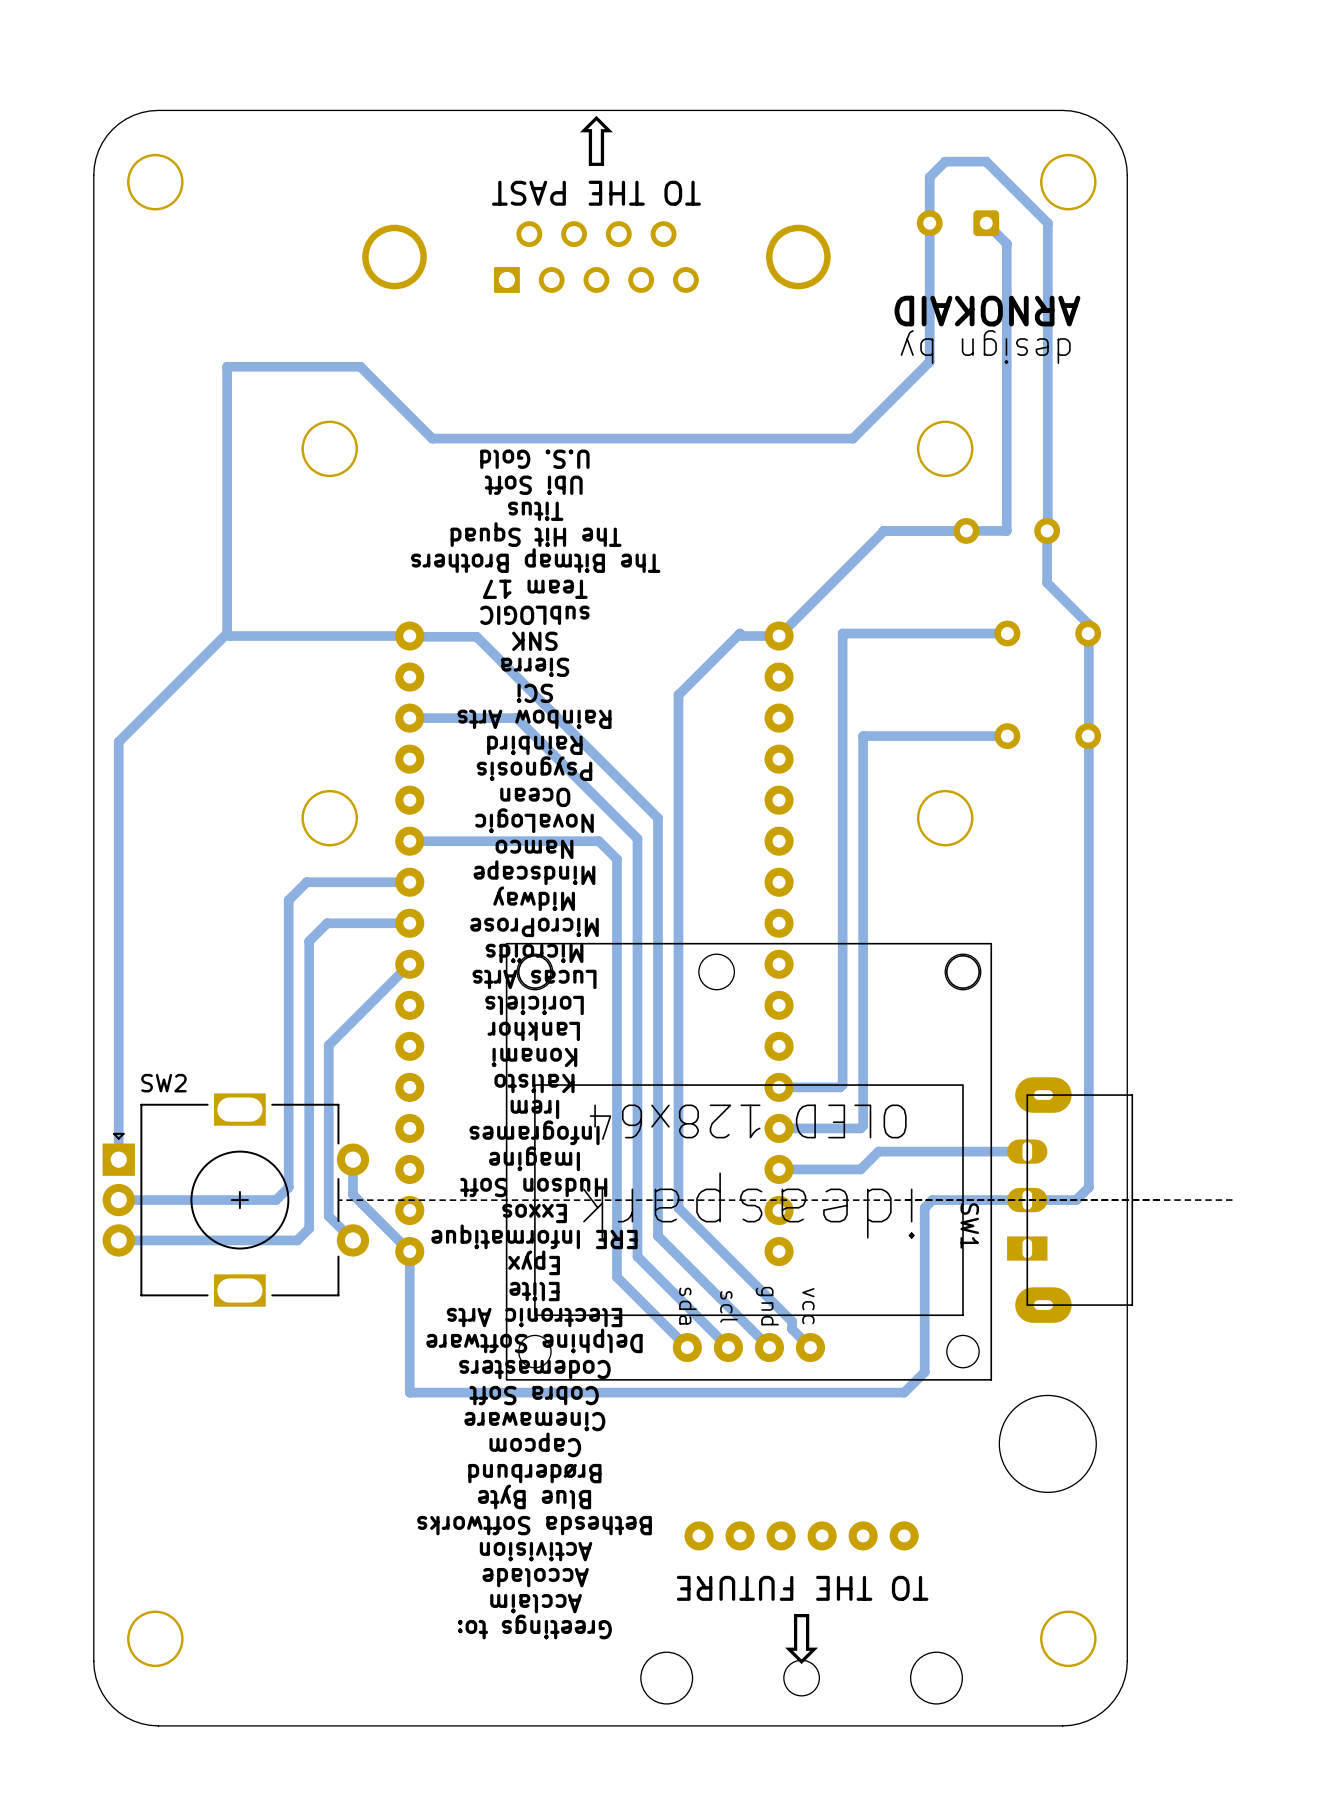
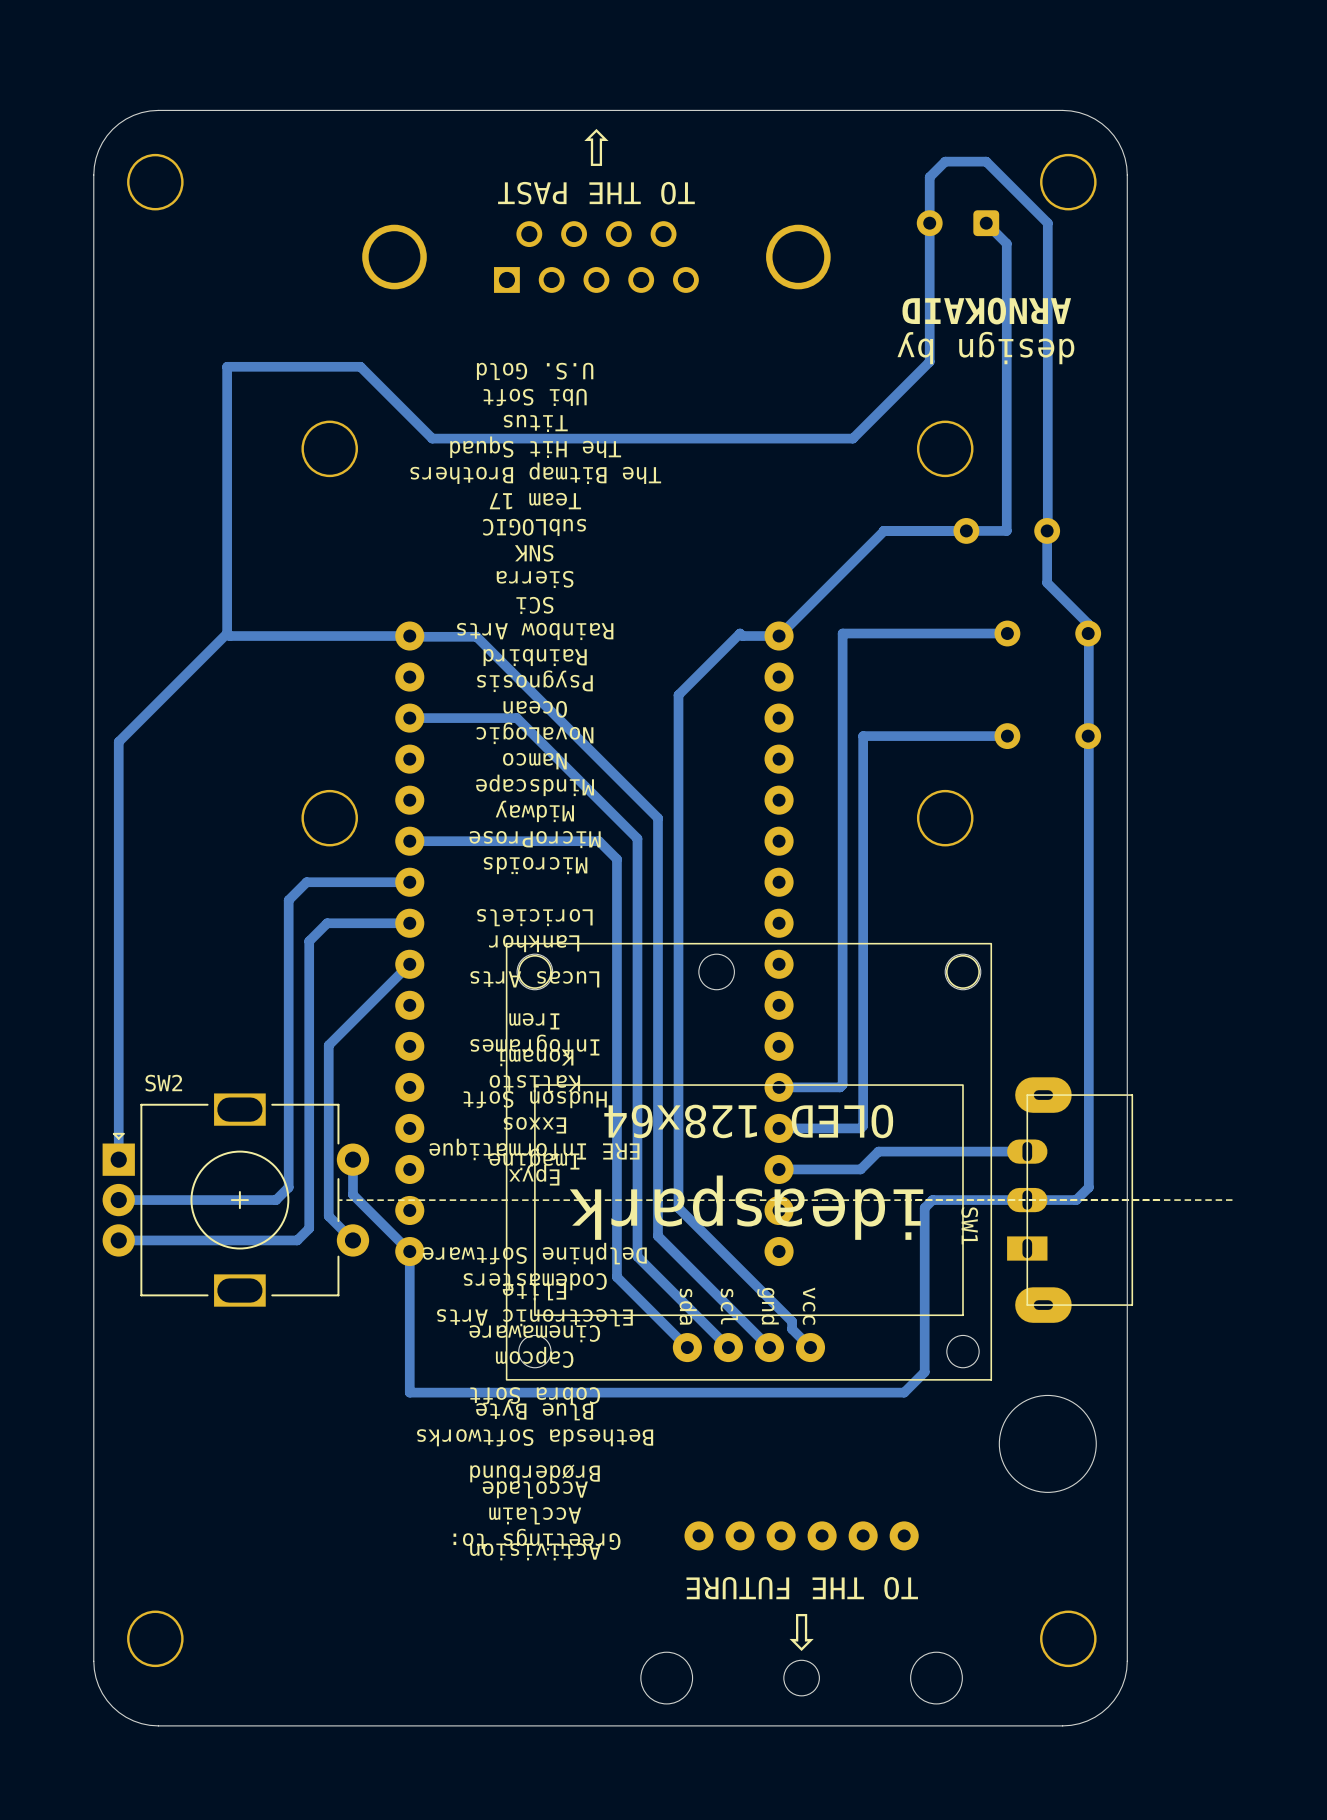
text position: U.S. Gold (534, 459) -> U.S. Gold (535, 371)
text position: Ubi Soft (533, 485) -> Ubi Soft (535, 397)
text position: Titus (535, 511) -> Titus (535, 423)
text position: The Hit Squad (536, 534) -> The Hit Squad (535, 447)
text position: The Bitmap Brothers (535, 560) -> The Bitmap Brothers (535, 473)
text position: Team 17 (535, 589) -> Team 17 (535, 501)
text position: subLOGIC (534, 615) -> subLOGIC (534, 527)
text position: SNK (534, 641) -> SNK (534, 553)
text position: Sierra (535, 667) -> Sierra (535, 579)
text position: SCi (534, 693) -> SCi (534, 605)
text position: Rainbow Arts (534, 719) -> Rainbow Arts (535, 631)
text position: Rainbird (534, 745) -> Rainbird (535, 657)
text position: Psygnosis (534, 768) -> Psygnosis (534, 681)
text position: Ocean (535, 797) -> Ocean (535, 709)
text position: NovaLogic (534, 820) -> NovaLogic (535, 733)
text position: Namco (534, 849) -> Namco (534, 761)
text position: Mindscape (534, 872) -> Mindscape (535, 785)
text position: Midway (534, 898) -> Midway (534, 811)
text position: MicroProse (534, 927) -> MicroProse (535, 839)
text position: Microïds (534, 953) -> Microïds (535, 865)
text position: Loriciels (534, 1005) -> Loriciels (534, 917)
text position: Lankhor (533, 1031) -> Lankhor (534, 943)
text position: Irem (534, 1109) -> Irem (534, 1021)
text position: Infogrames (534, 1132) -> Infogrames (534, 1045)
text position: Hudson Soft (533, 1187) -> Hudson Soft (535, 1099)
text position: Exxos (534, 1213) -> Exxos (534, 1125)
text position: ERE Informatique (534, 1236) -> ERE Informatique (534, 1149)
text position: Epyx (534, 1262) -> Epyx (534, 1175)
text position: Delphine Software (534, 1340) -> Delphine Software (534, 1253)
text position: Codemasters (534, 1369) -> Codemasters (535, 1281)
text position: Cinemaware (534, 1421) -> Cinemaware (534, 1333)
text position: Capcom (535, 1444) -> Capcom (534, 1357)
text position: Blue Byte (534, 1496) -> Blue Byte (534, 1409)
text position: Bethesda Softworks (534, 1525) -> Bethesda Softworks (535, 1437)
text position: Accolade (535, 1577) -> Accolade (535, 1489)
text position: Acclaim (536, 1603) -> Acclaim (535, 1515)
text position: Greetings to: (534, 1626) -> Greetings to: (537, 1539)

